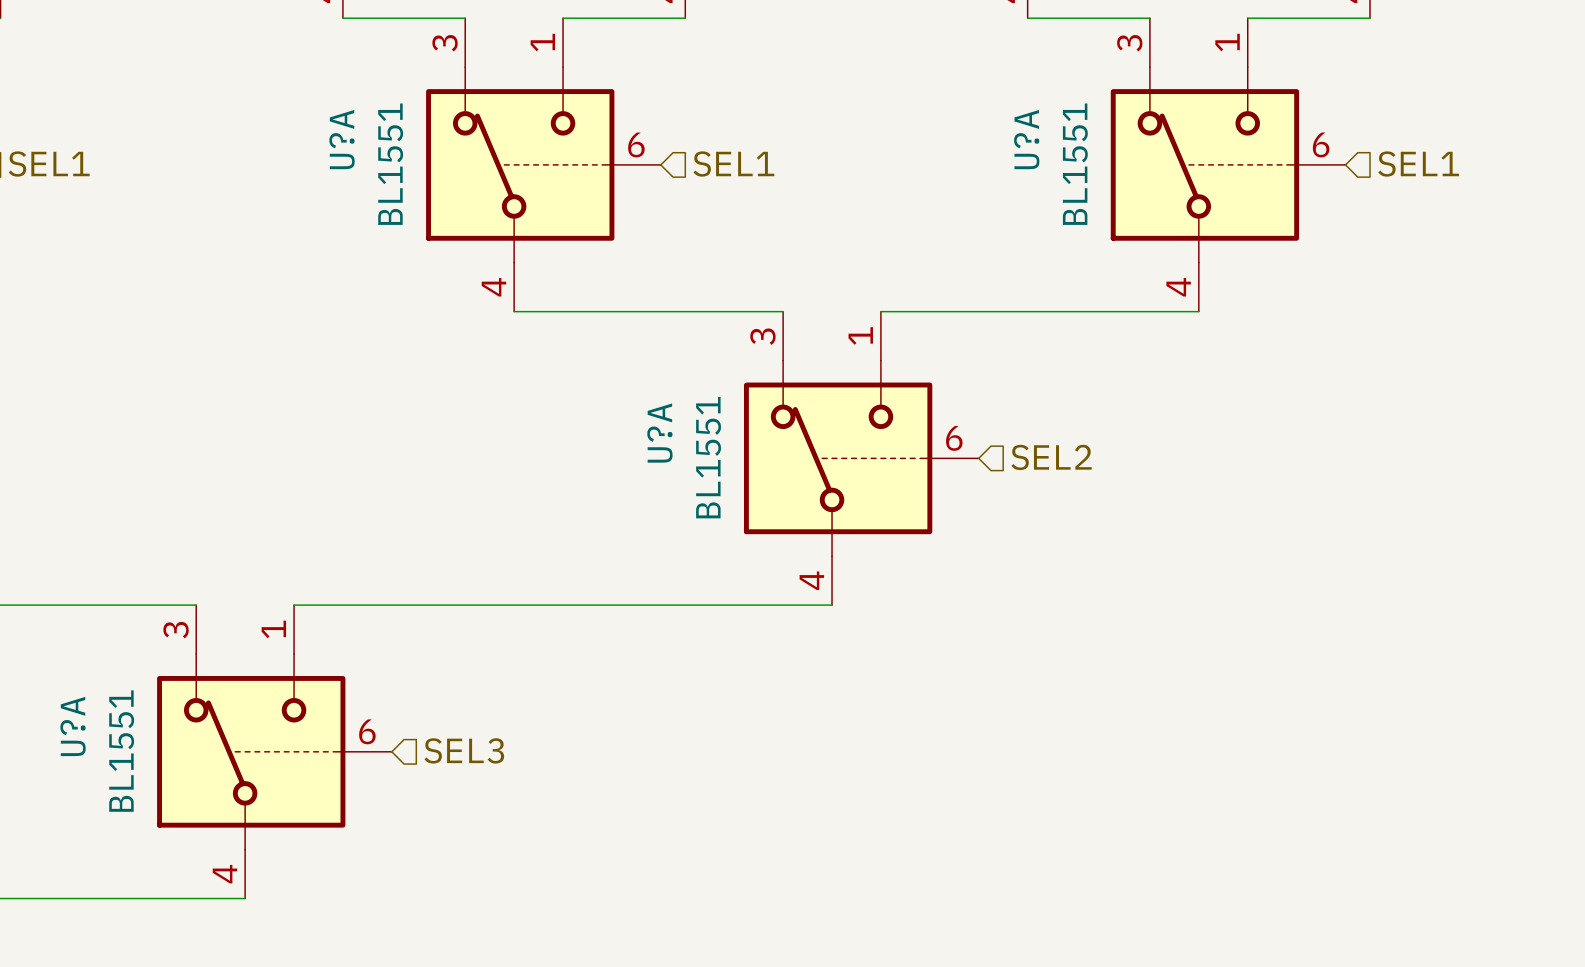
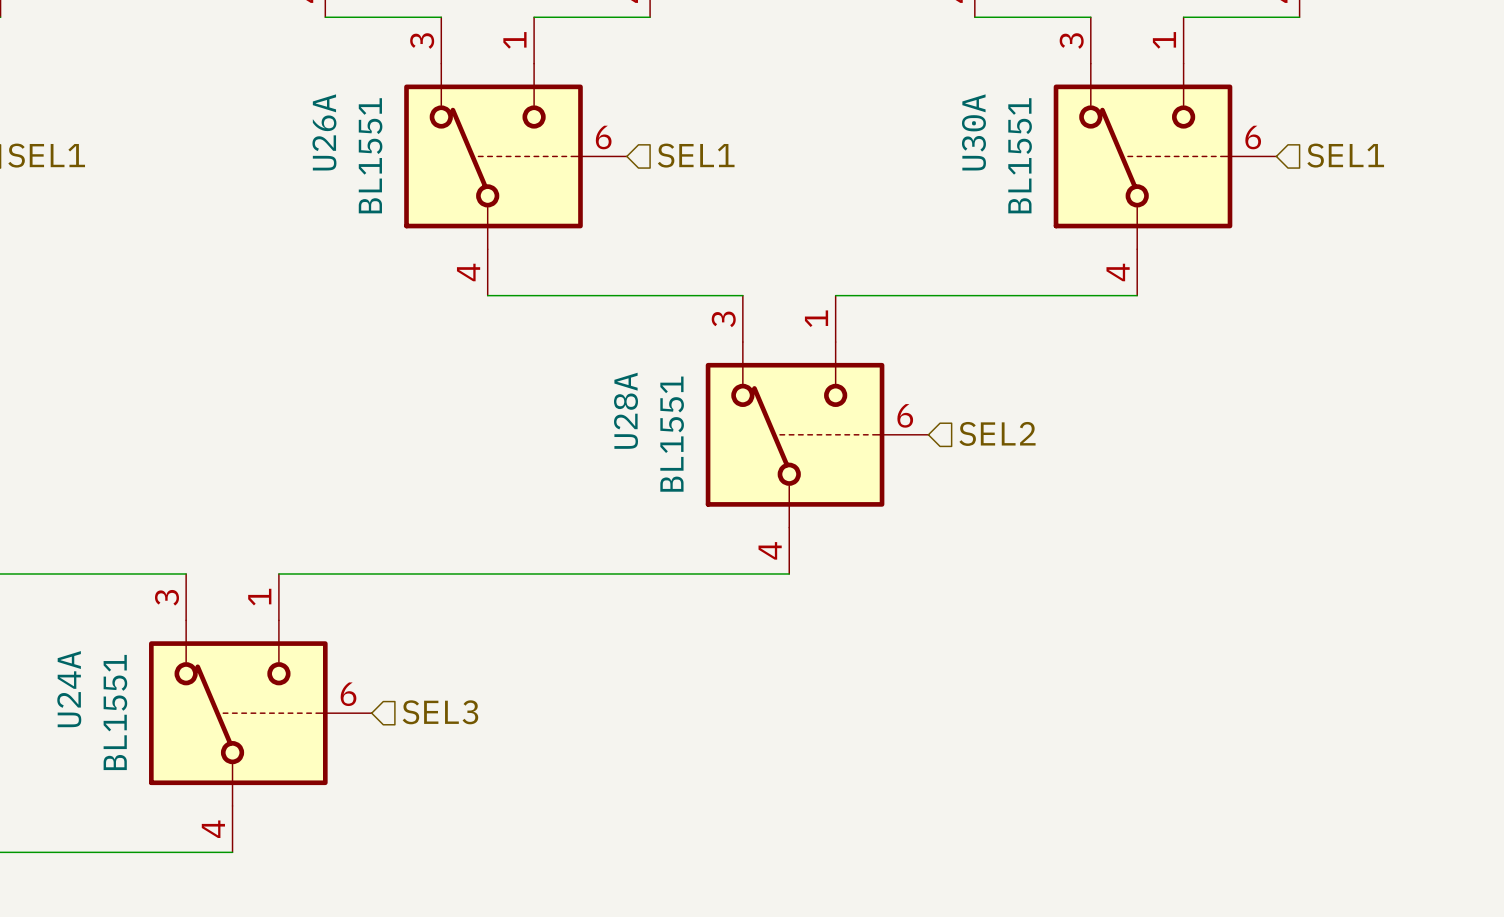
U?A name: U?A (342, 139) -> U26A (324, 132)
U?A name: U?A (1026, 139) -> U30A (973, 132)
U?A name: U?A (659, 433) -> U28A (626, 410)
U?A name: U?A (73, 726) -> U24A (69, 689)

